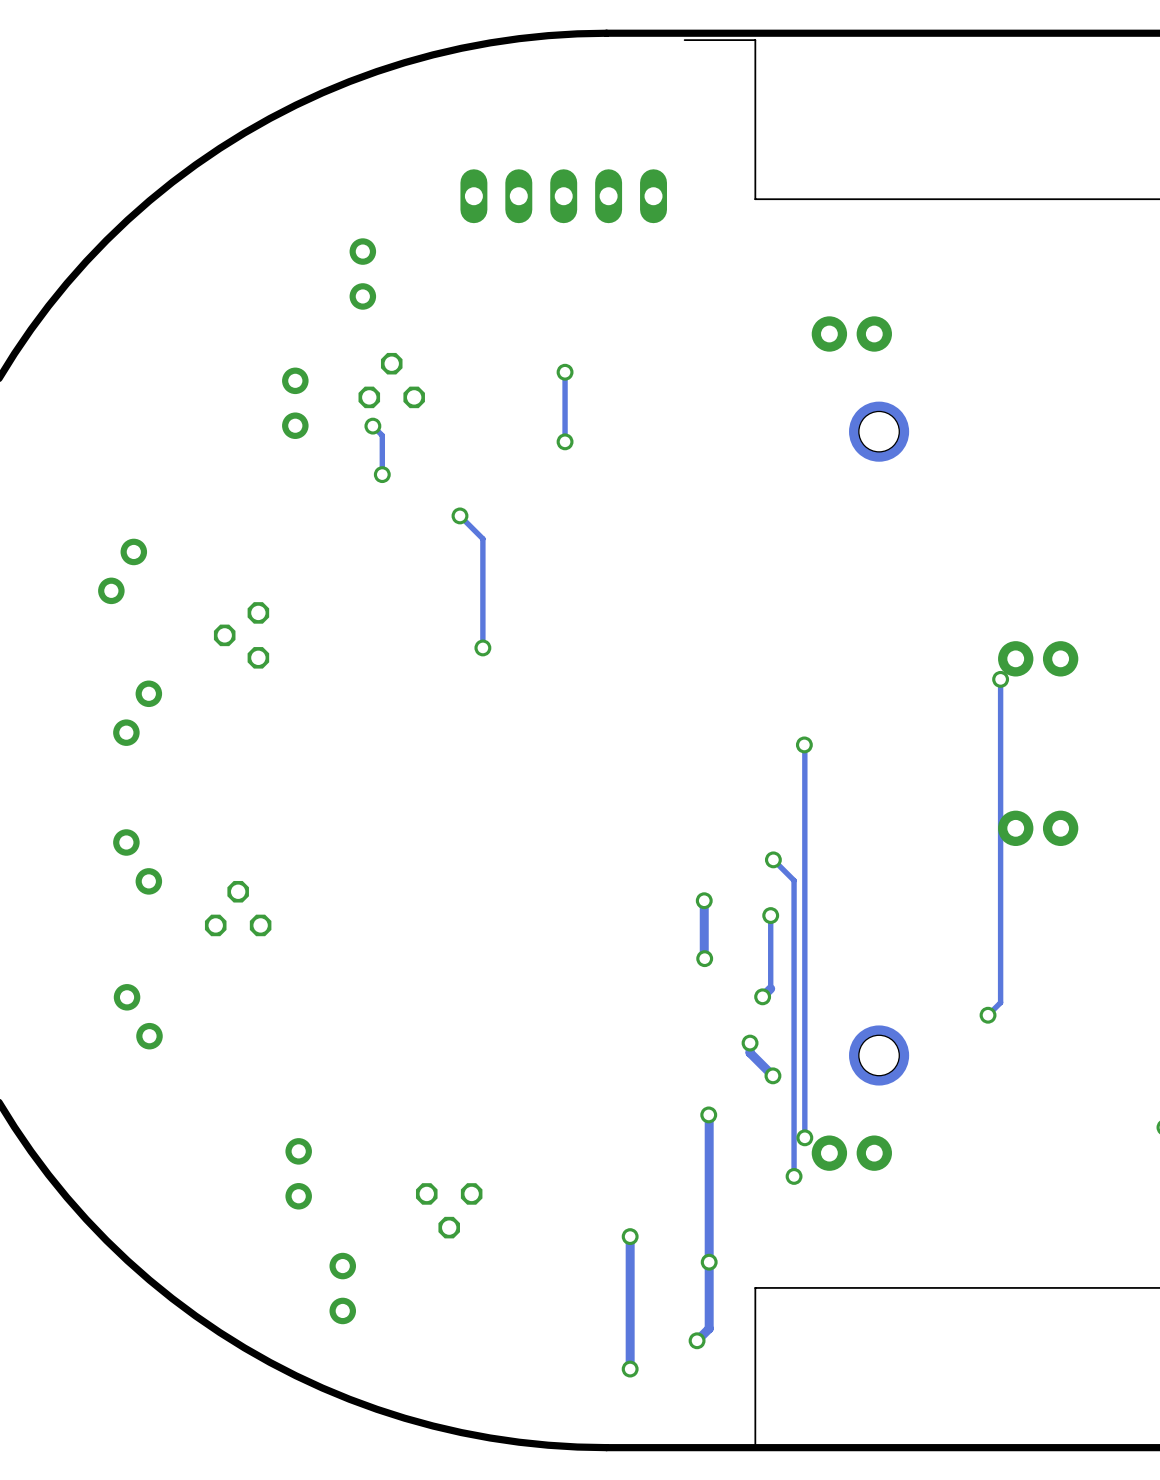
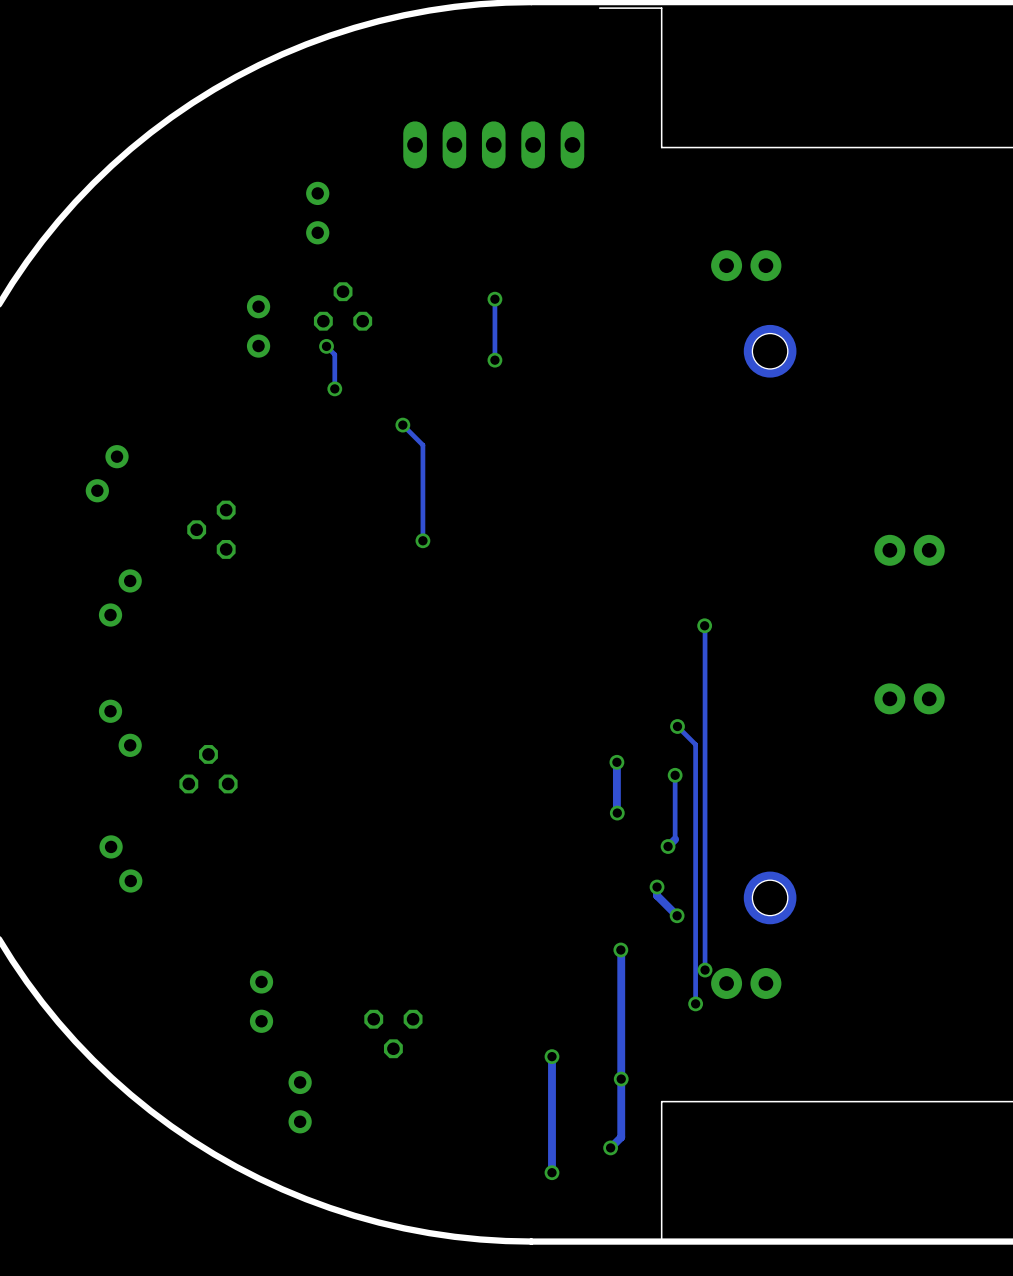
track: (1000, 679) (1000, 1002) (988, 1015) -> none
via: (1000, 679) -> none
via: (988, 1015) -> none

